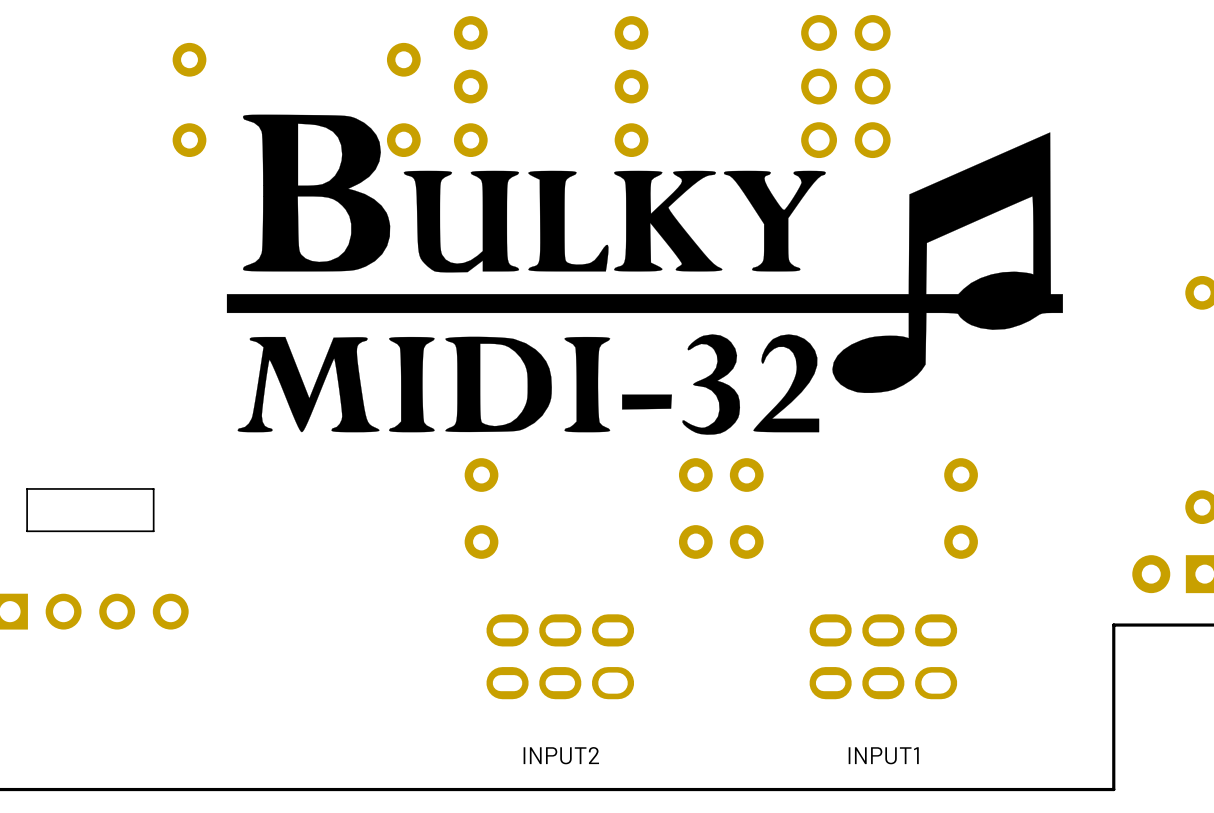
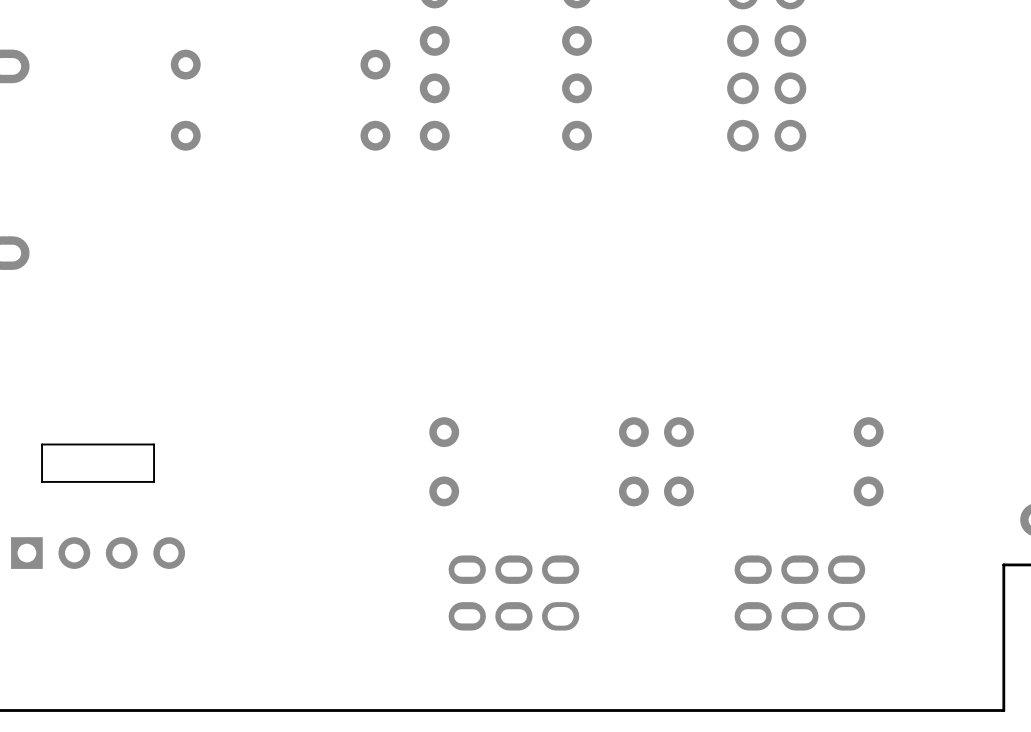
drawing: [226, 114, 1063, 435] -> none
text: INPUT2 (561, 755) -> none
text: INPUT1 (883, 755) -> none

